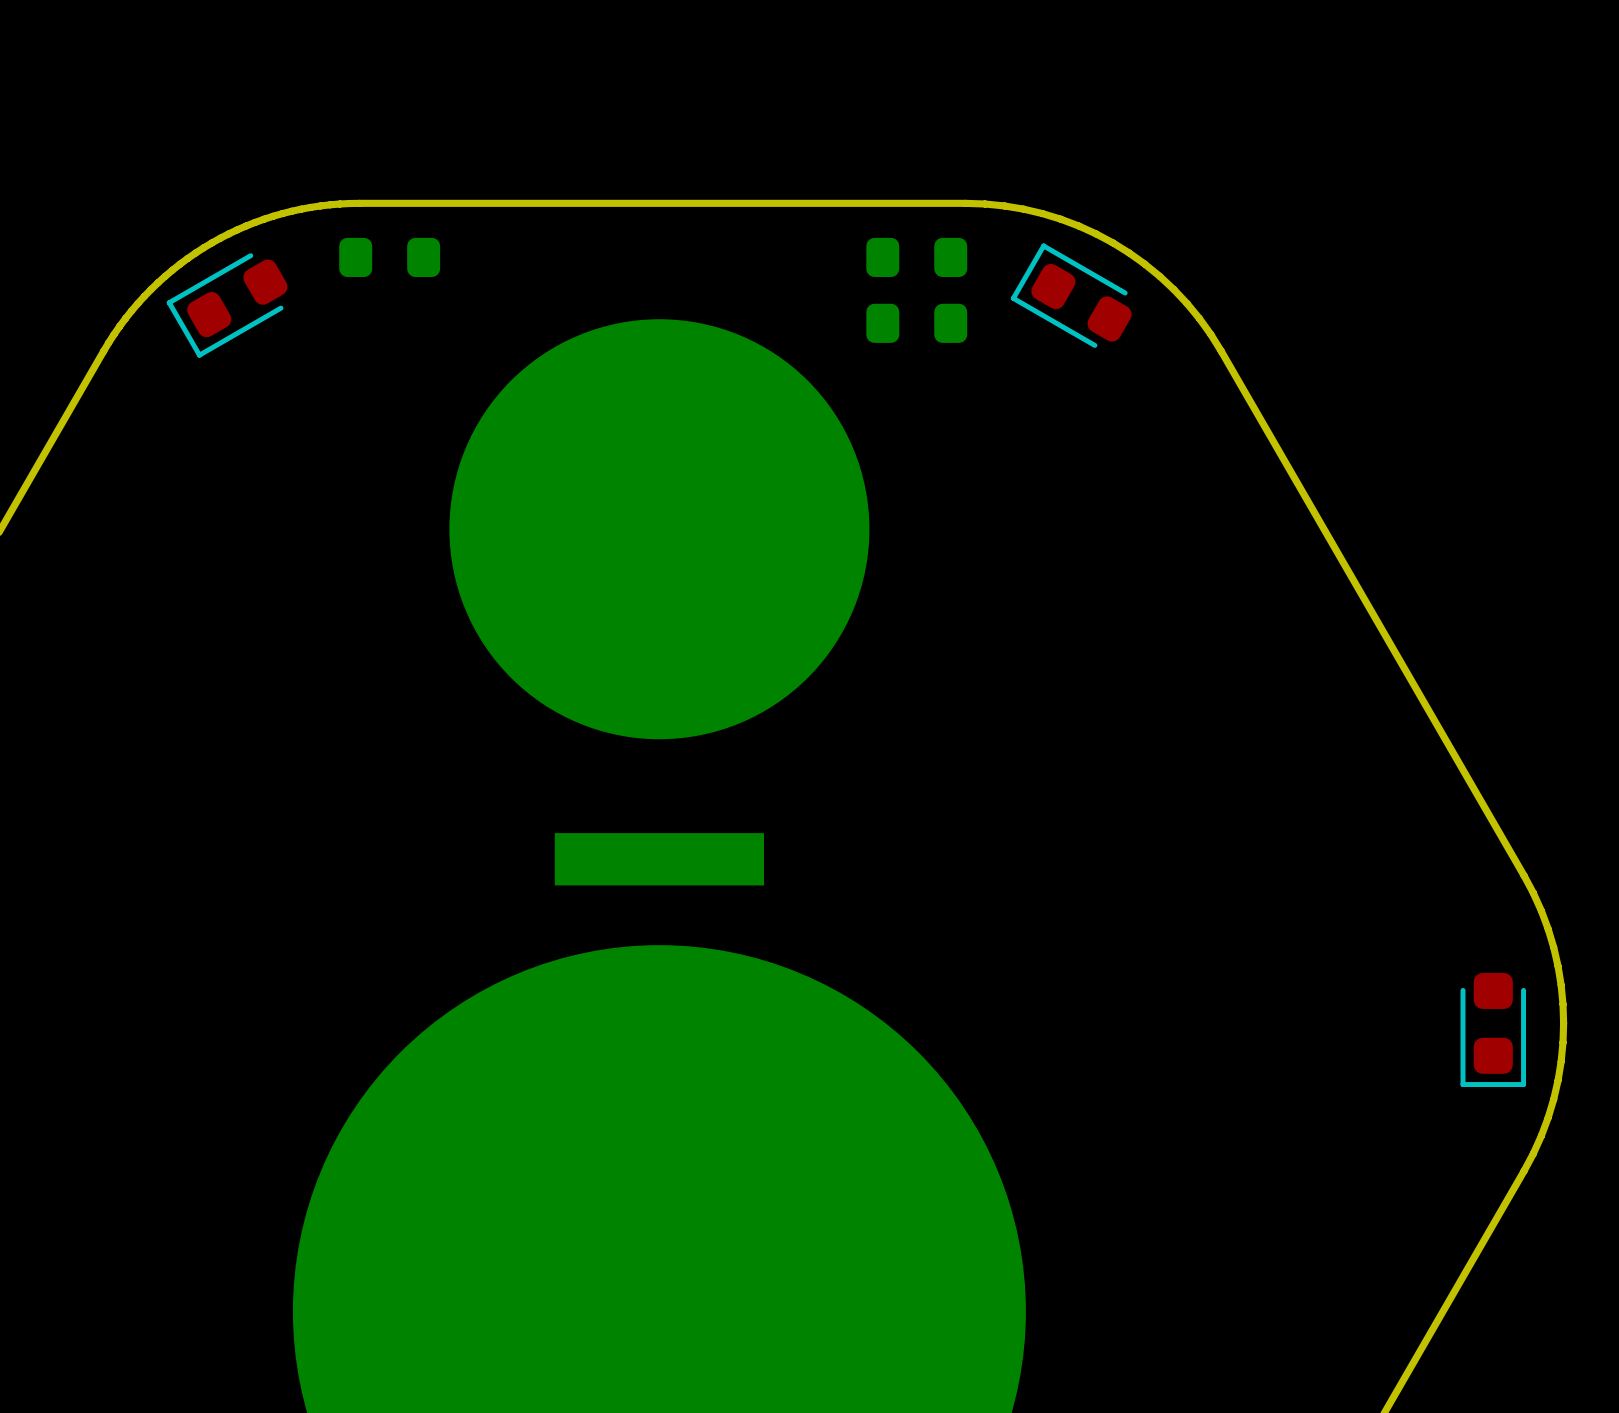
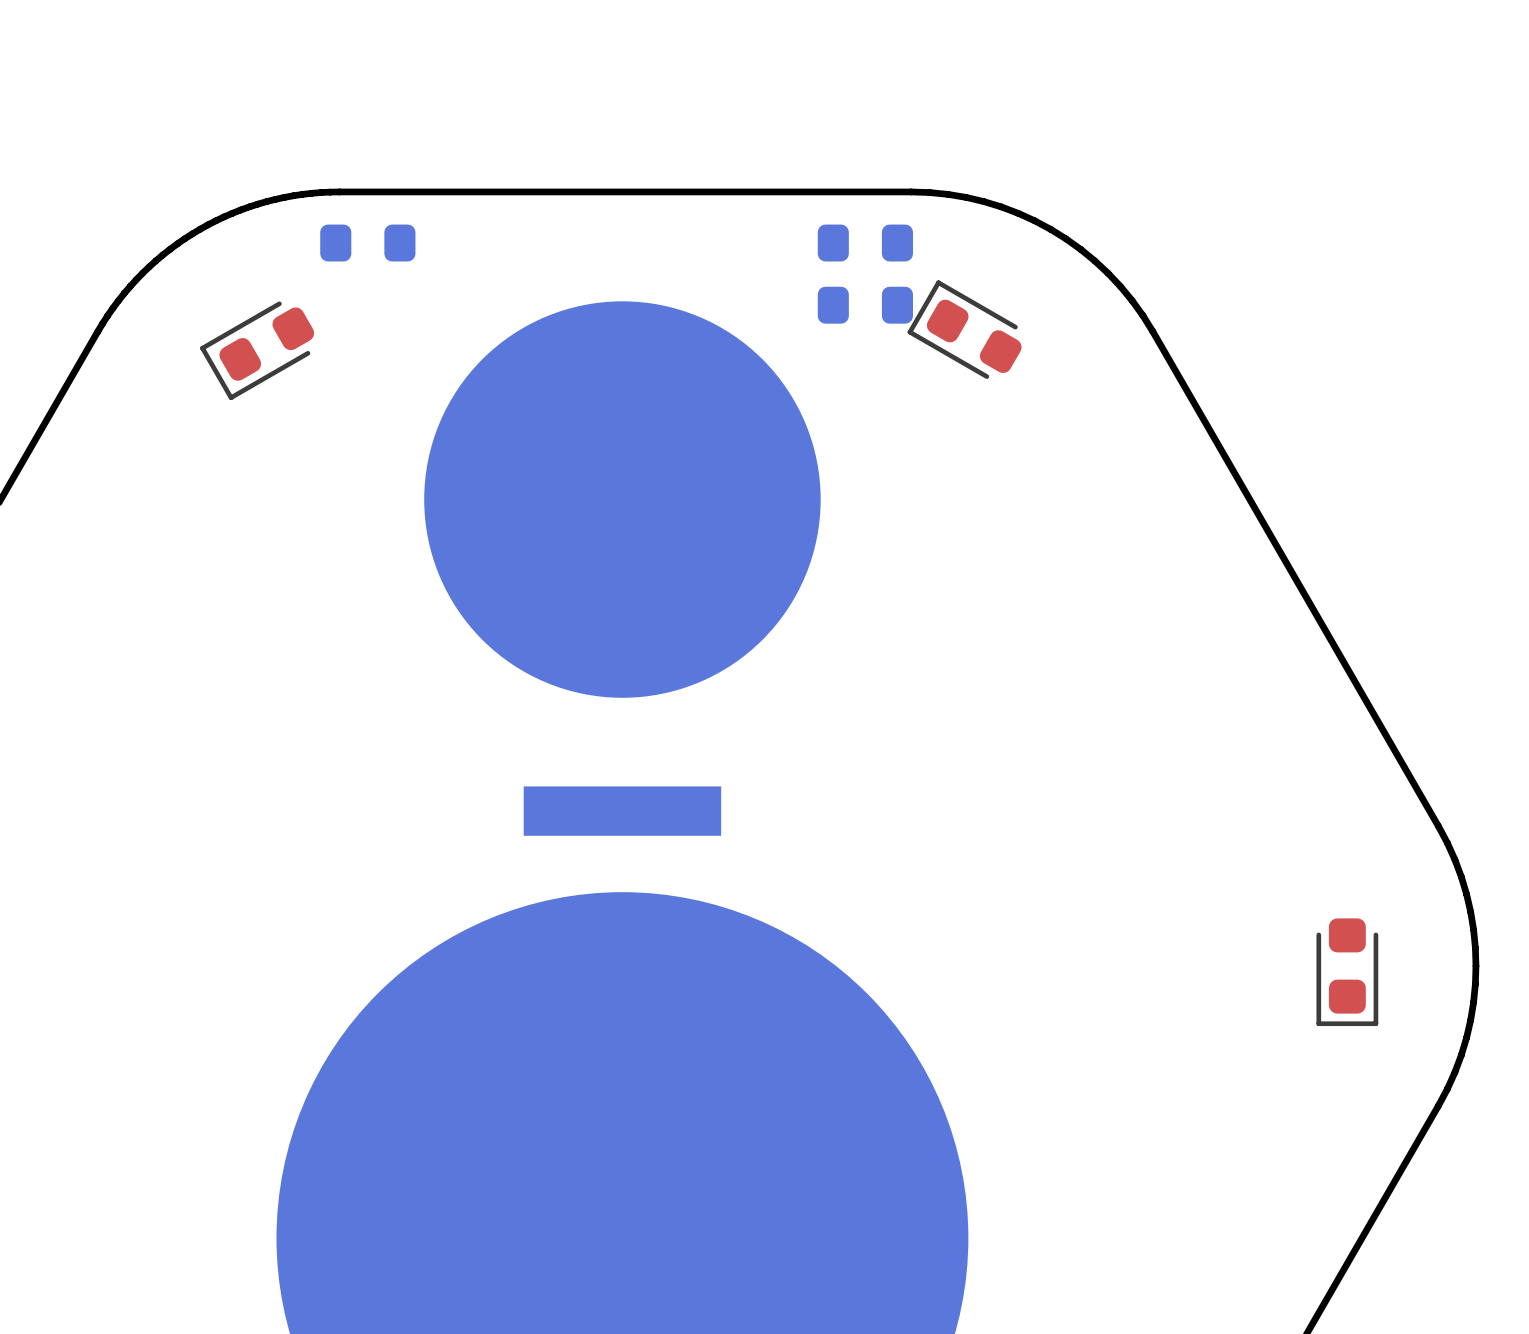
part position: (1071, 295) -> (964, 329)
part position: (227, 305) -> (257, 350)
part position: (1493, 1029) -> (1347, 972)

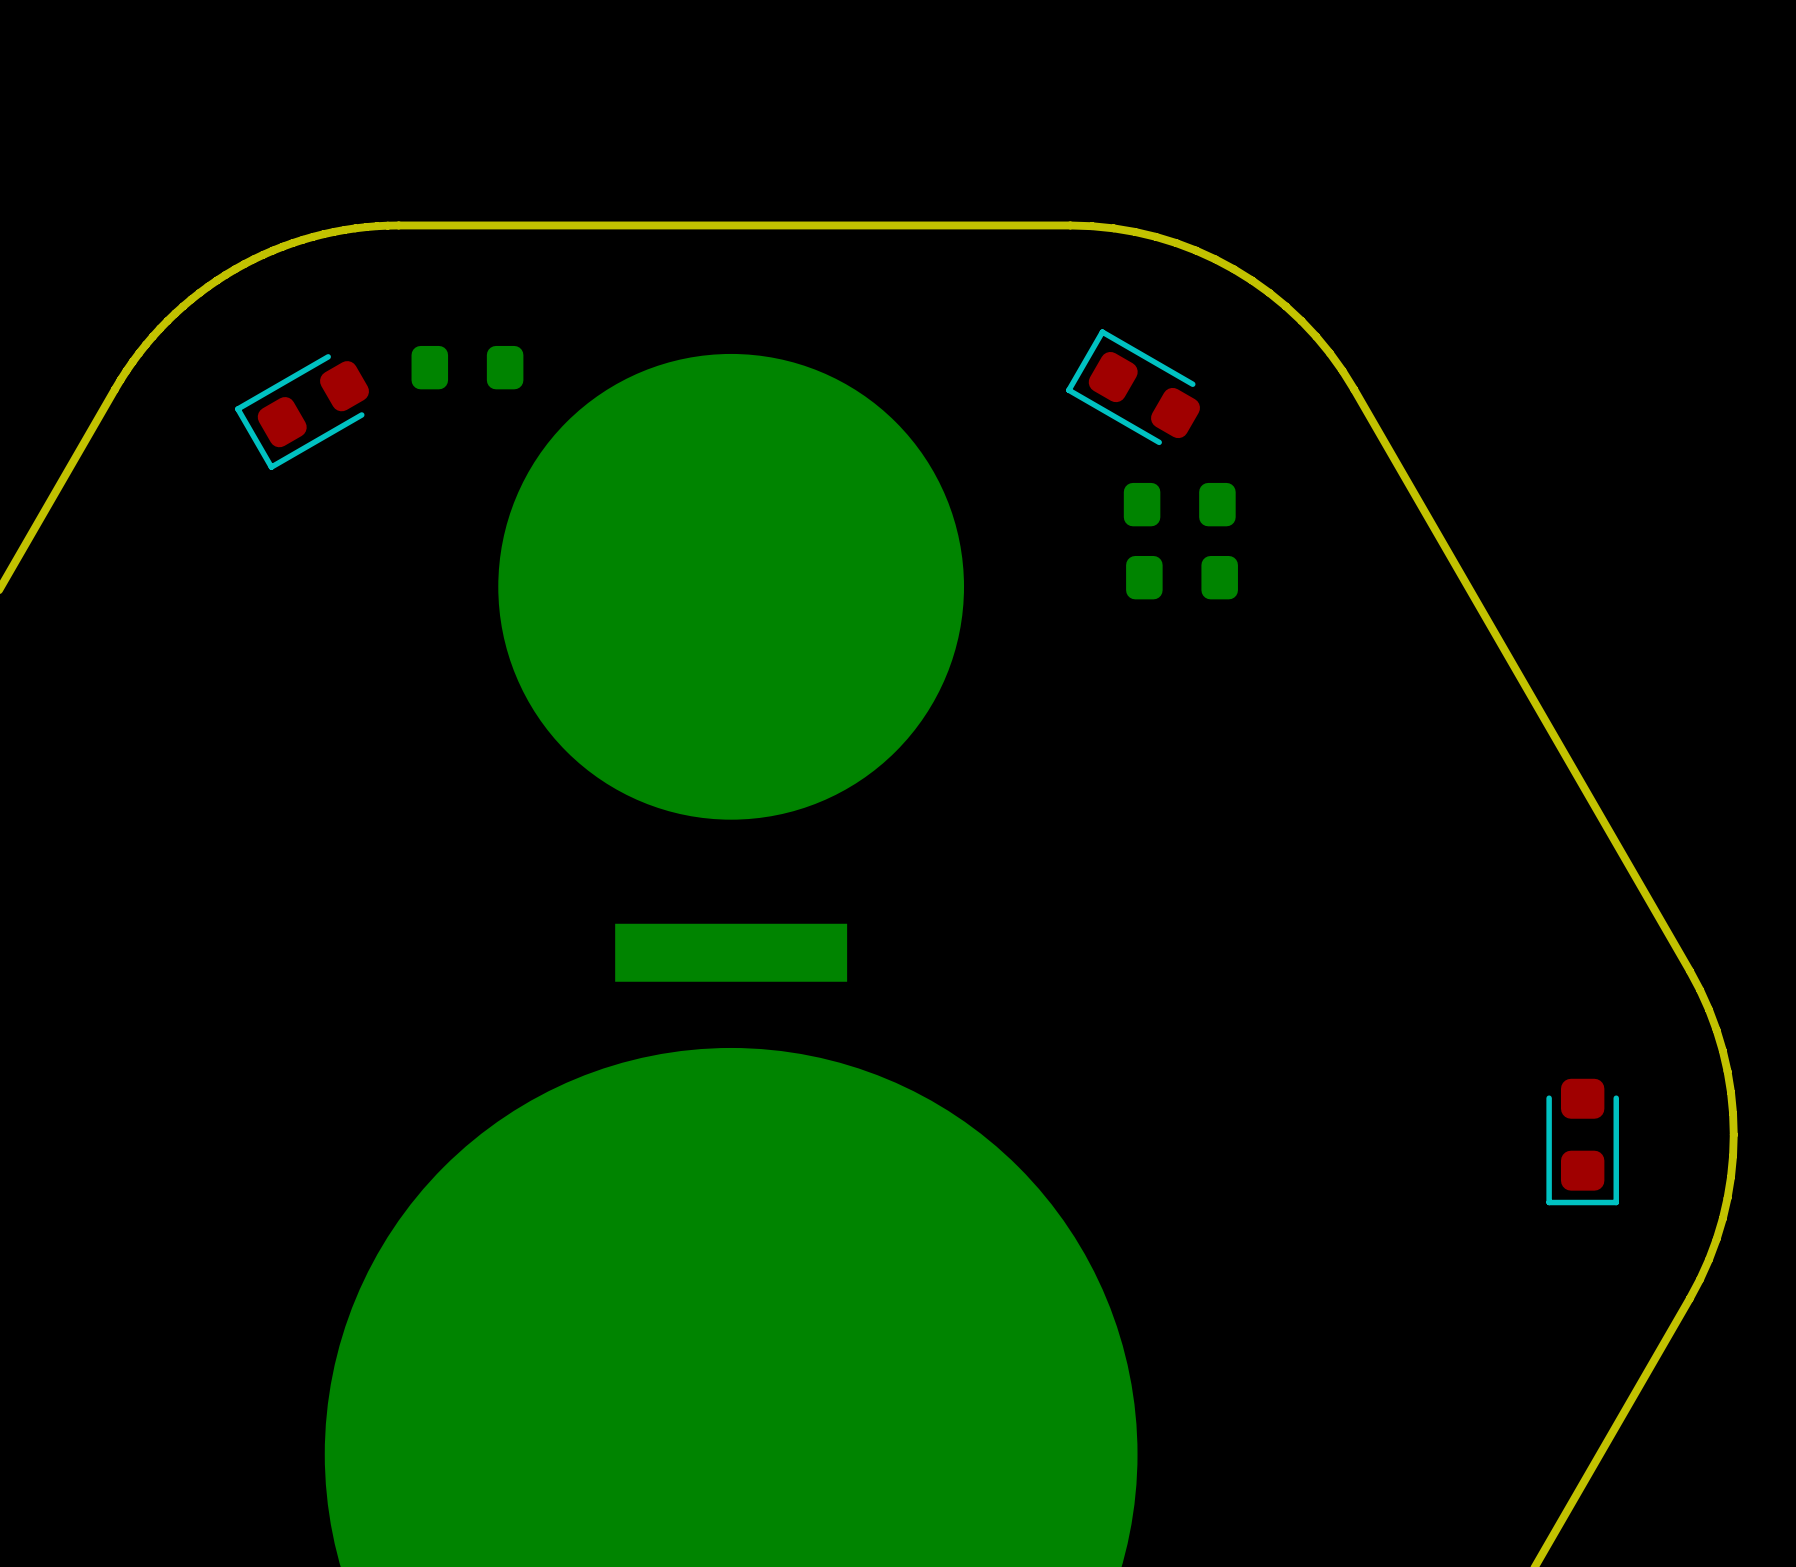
part position: (367, 243) -> (467, 367)
part: (865, 243) -> none
part: (865, 305) -> none
part: none -> (1179, 504)
part: none -> (1182, 577)

